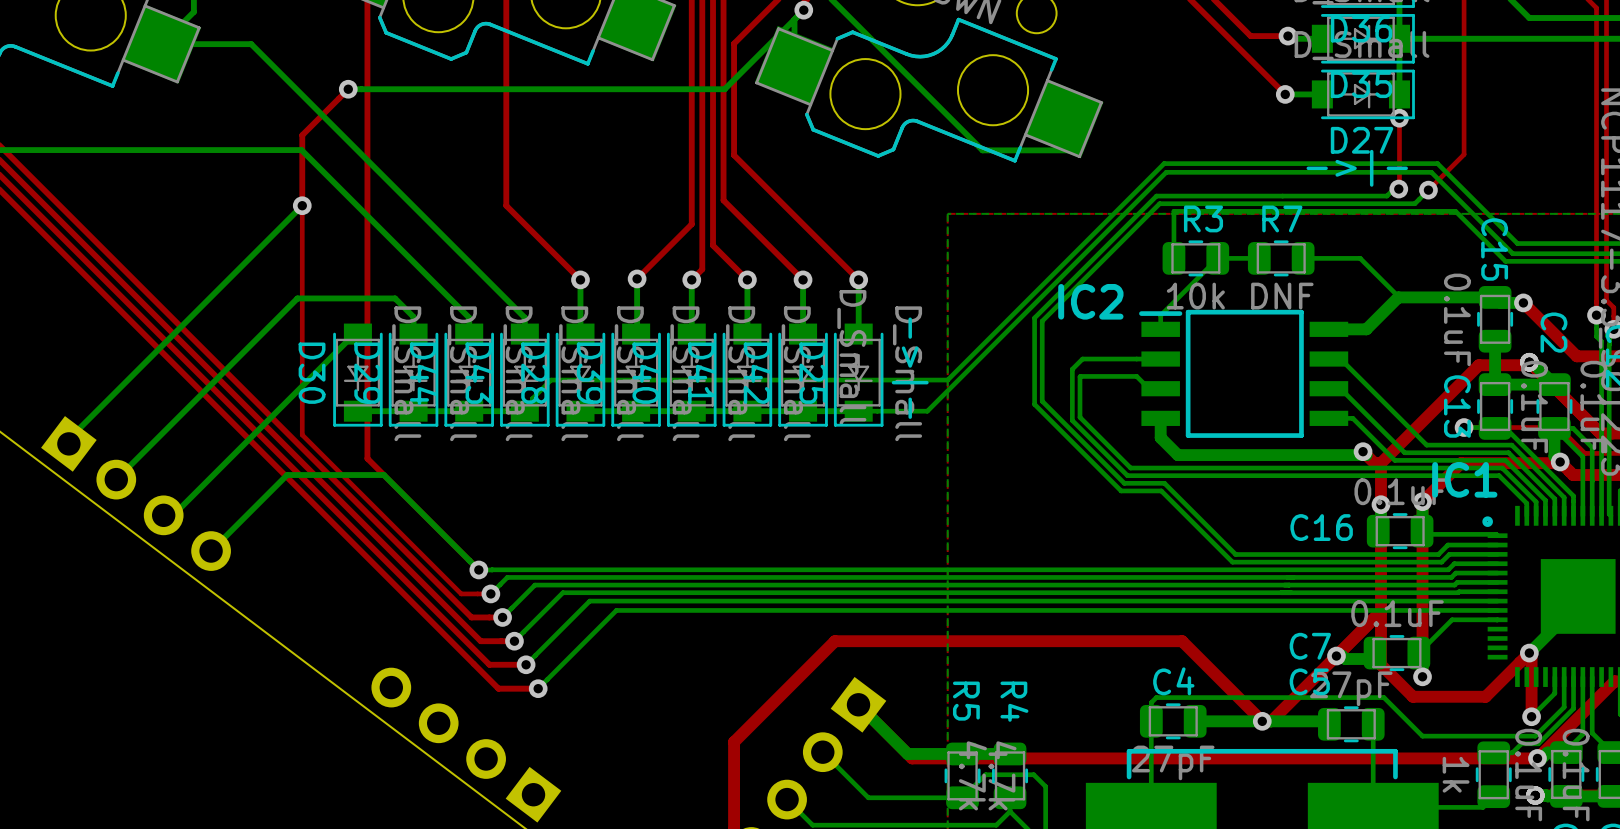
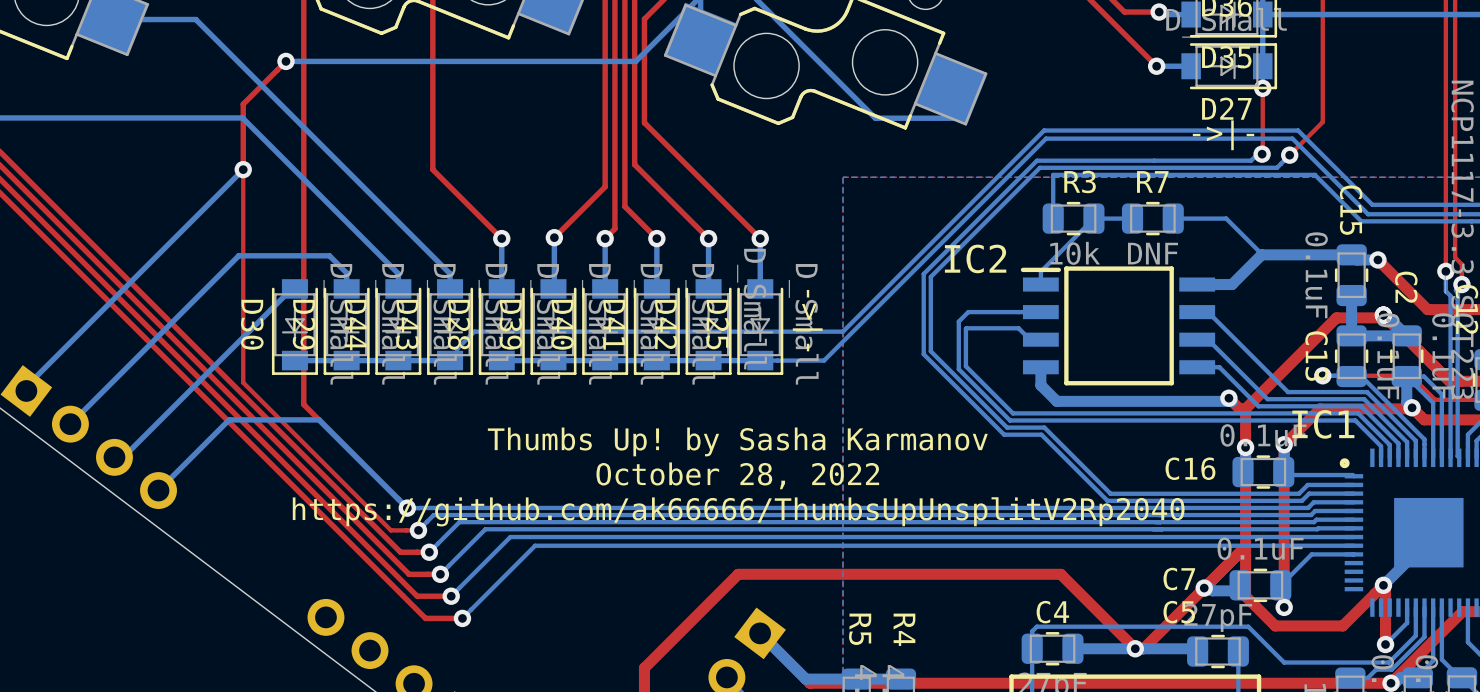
text: none -> Thumbs Up! by Sasha Karmanov (737, 441)
text: none -> October 28, 2022 (737, 475)
text: none -> https://github.com/ak66666/ThumbsUpUnsplitV2Rp2040 (738, 511)

